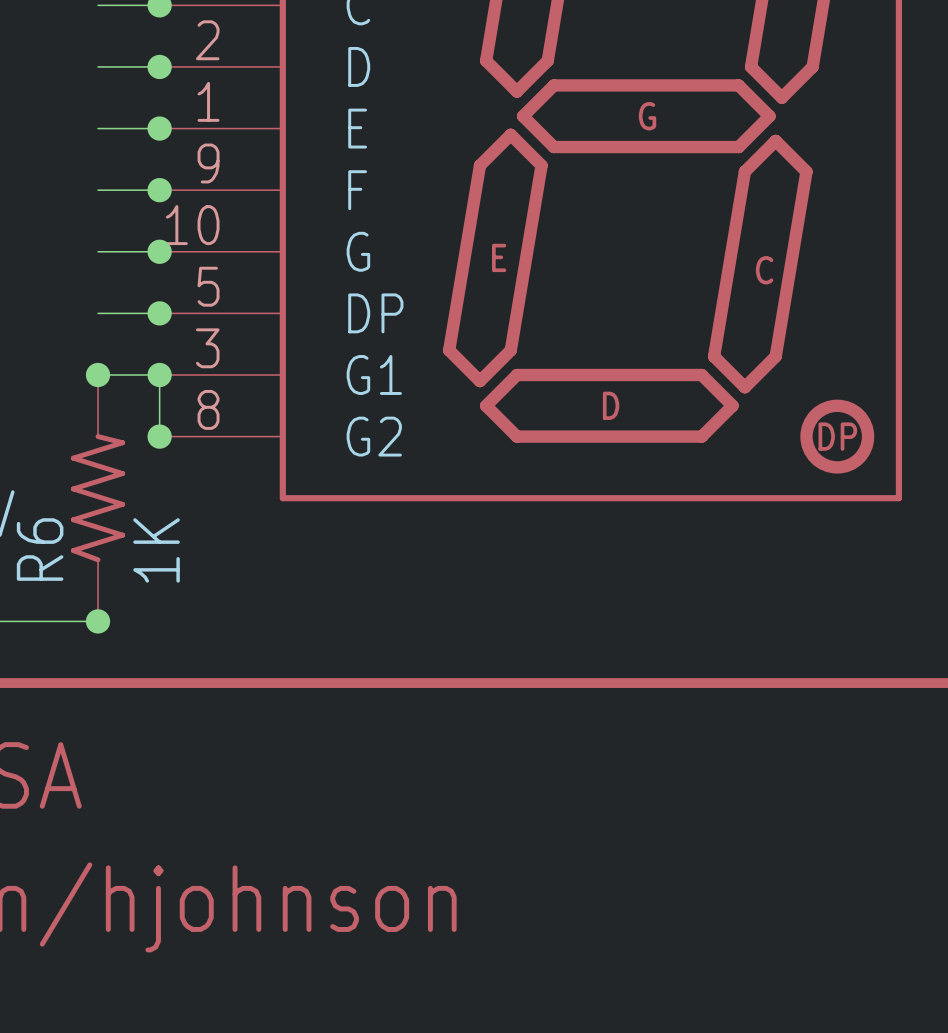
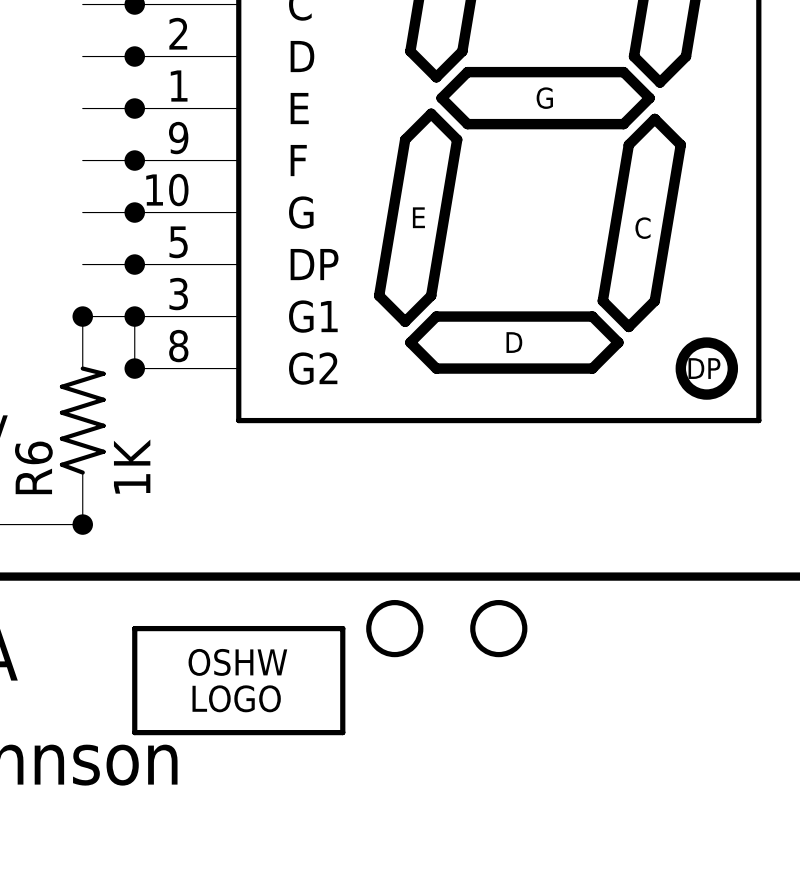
part: none -> (394, 628)
part: none -> (498, 628)
part: none -> (238, 680)

